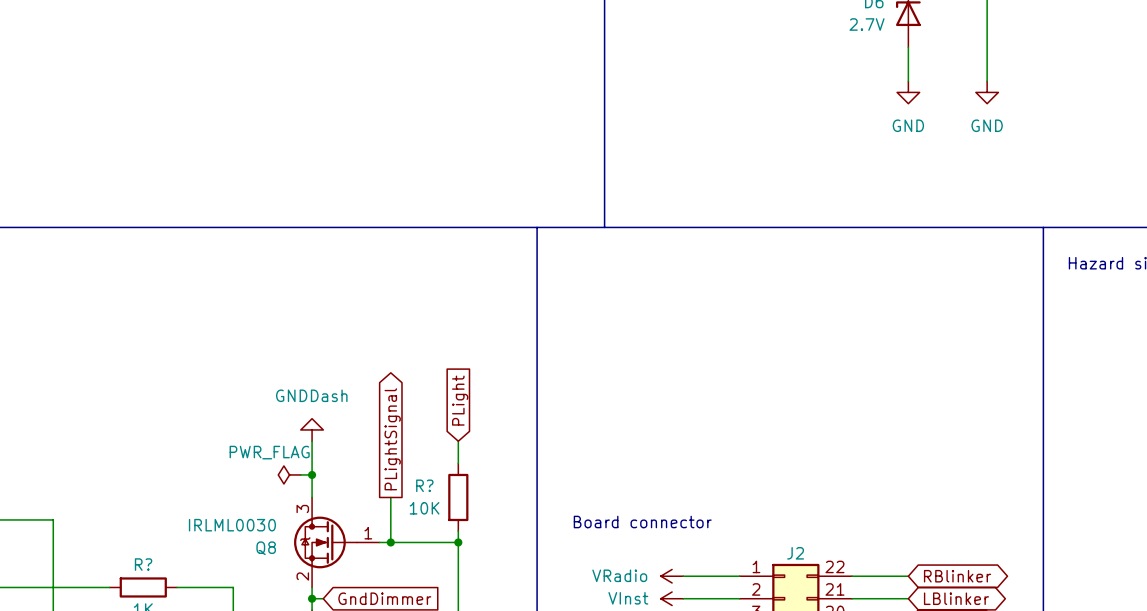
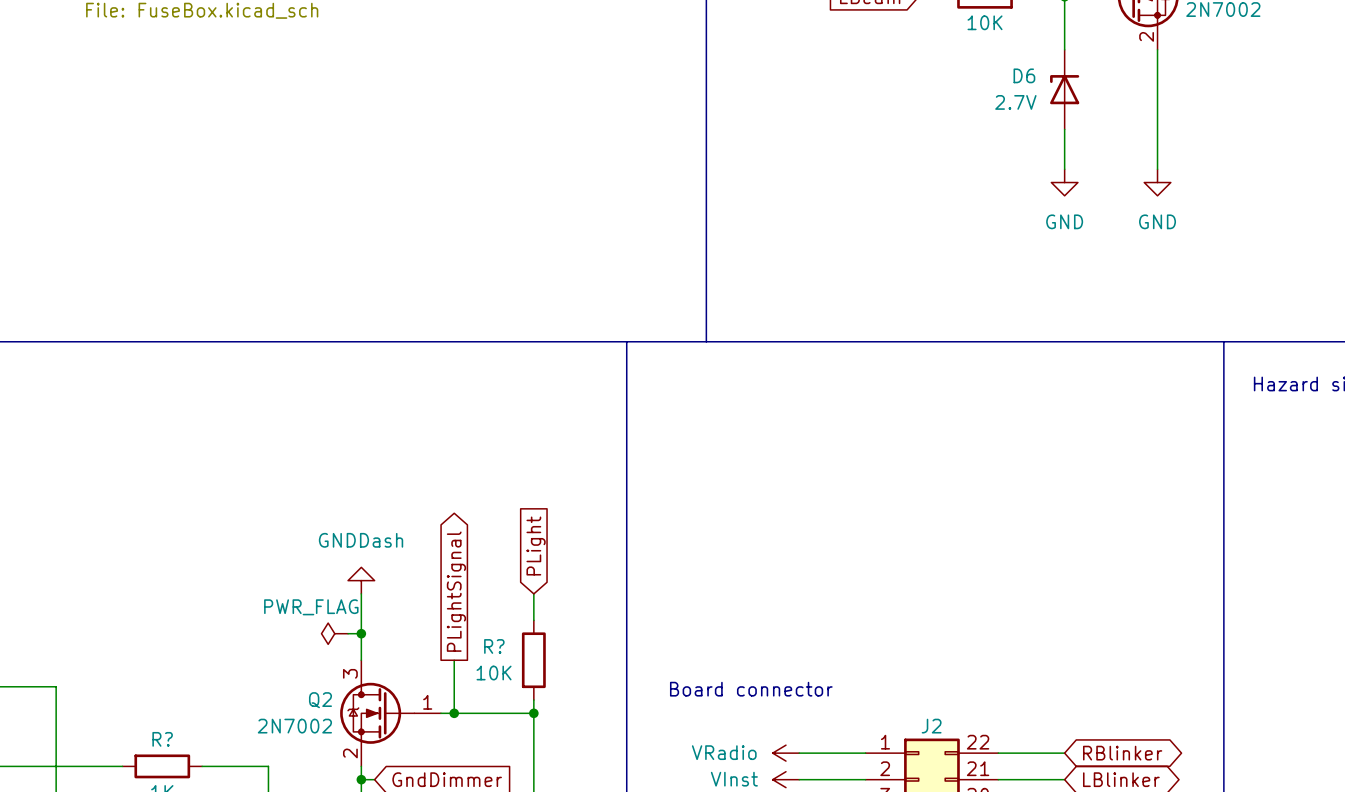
Q8 value: IRLML0030 (232, 525) -> 2N7002 (294, 726)
Q8 name: Q8 (266, 548) -> Q2 (320, 700)

